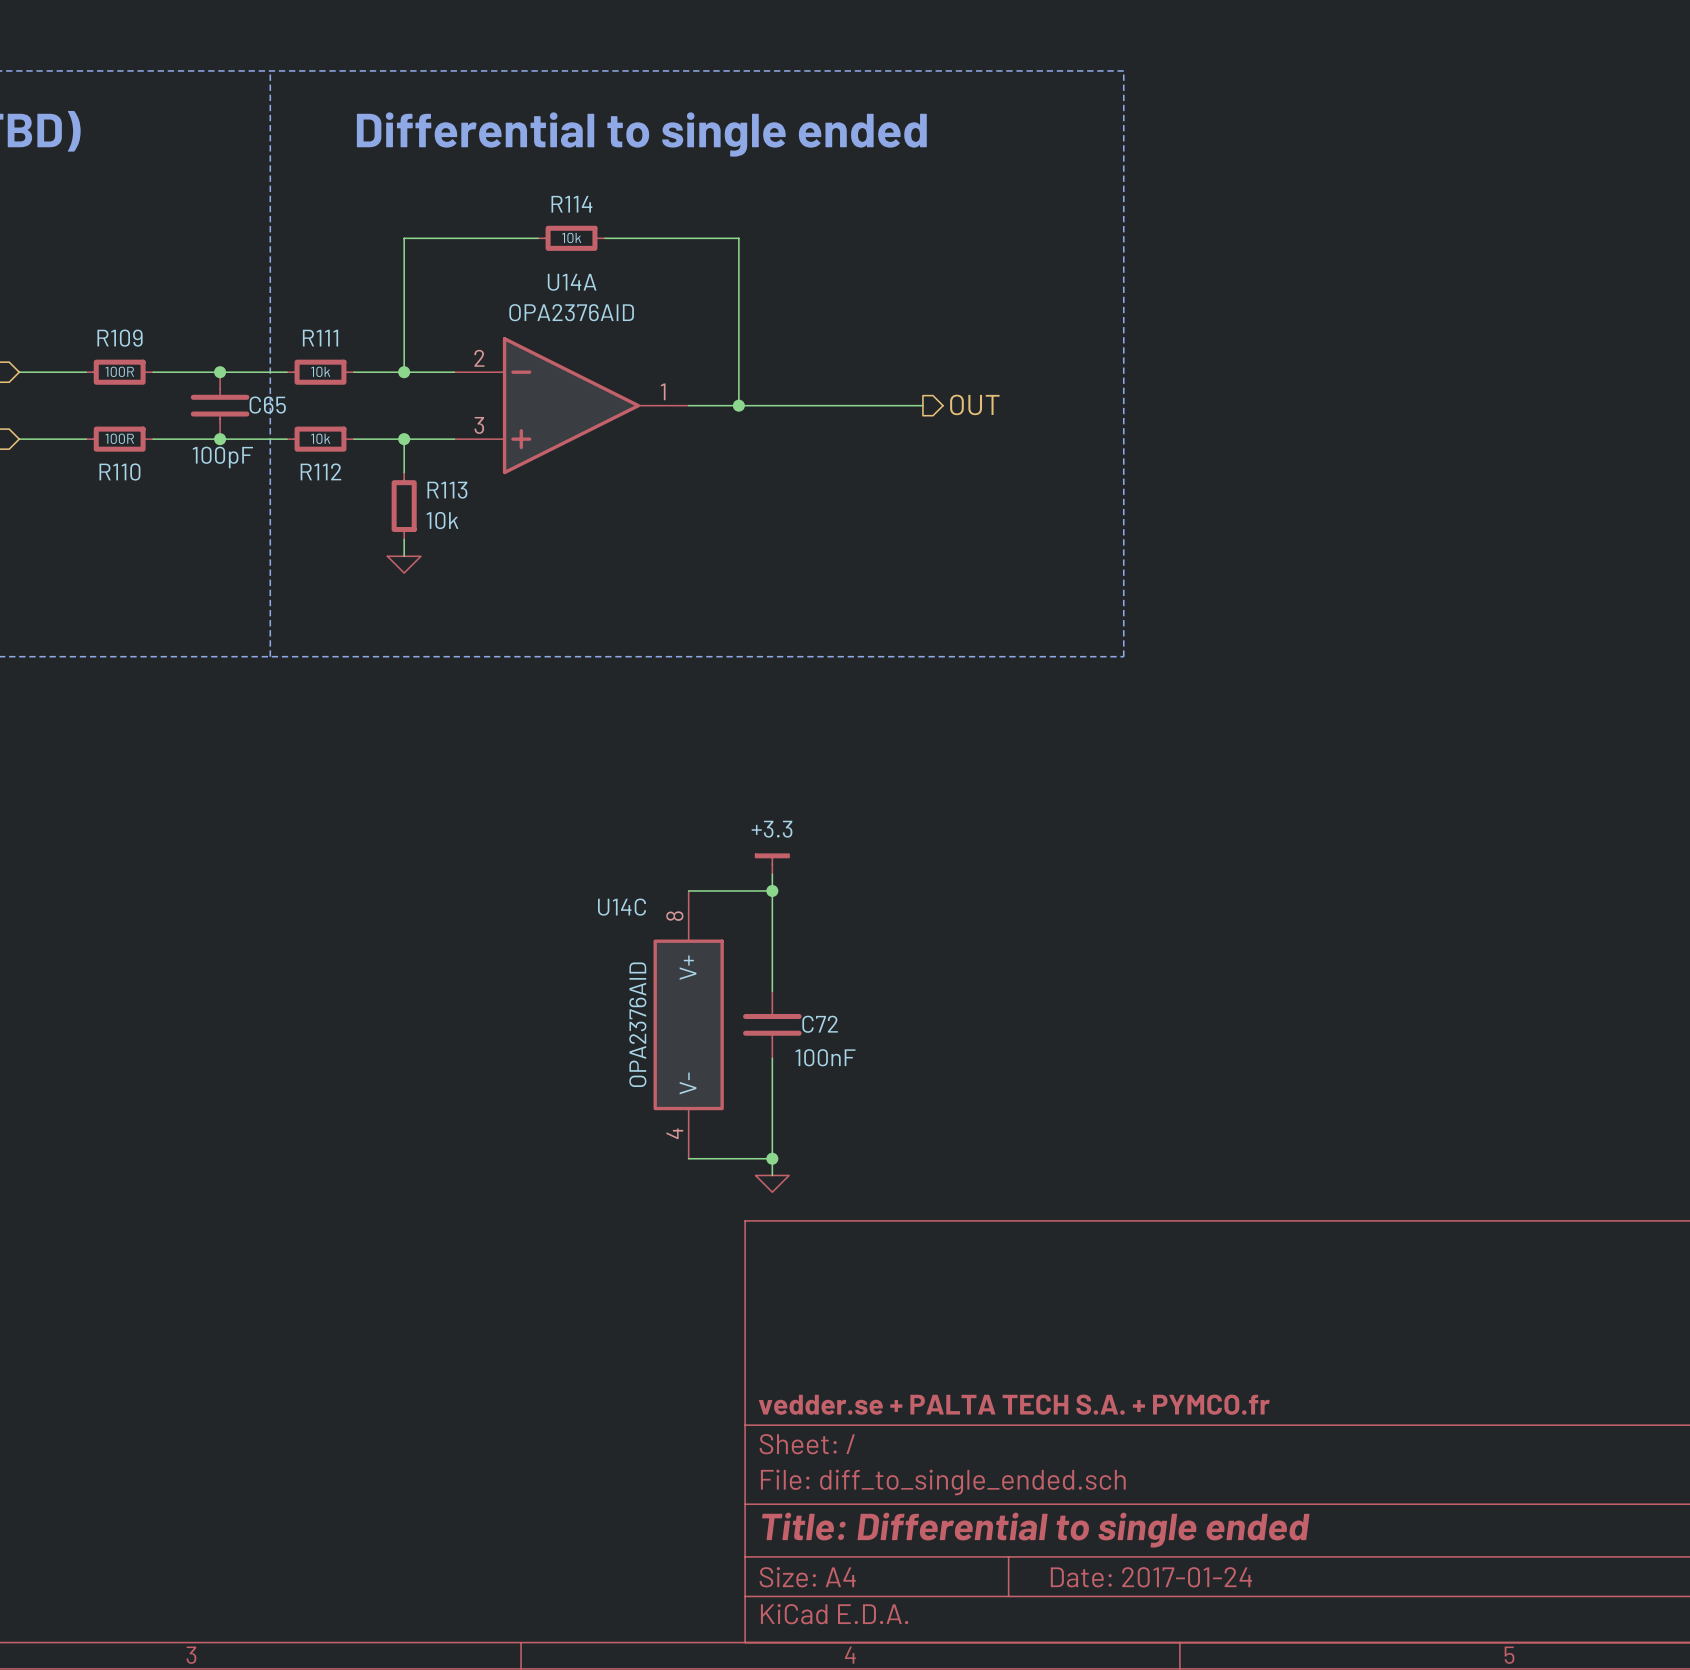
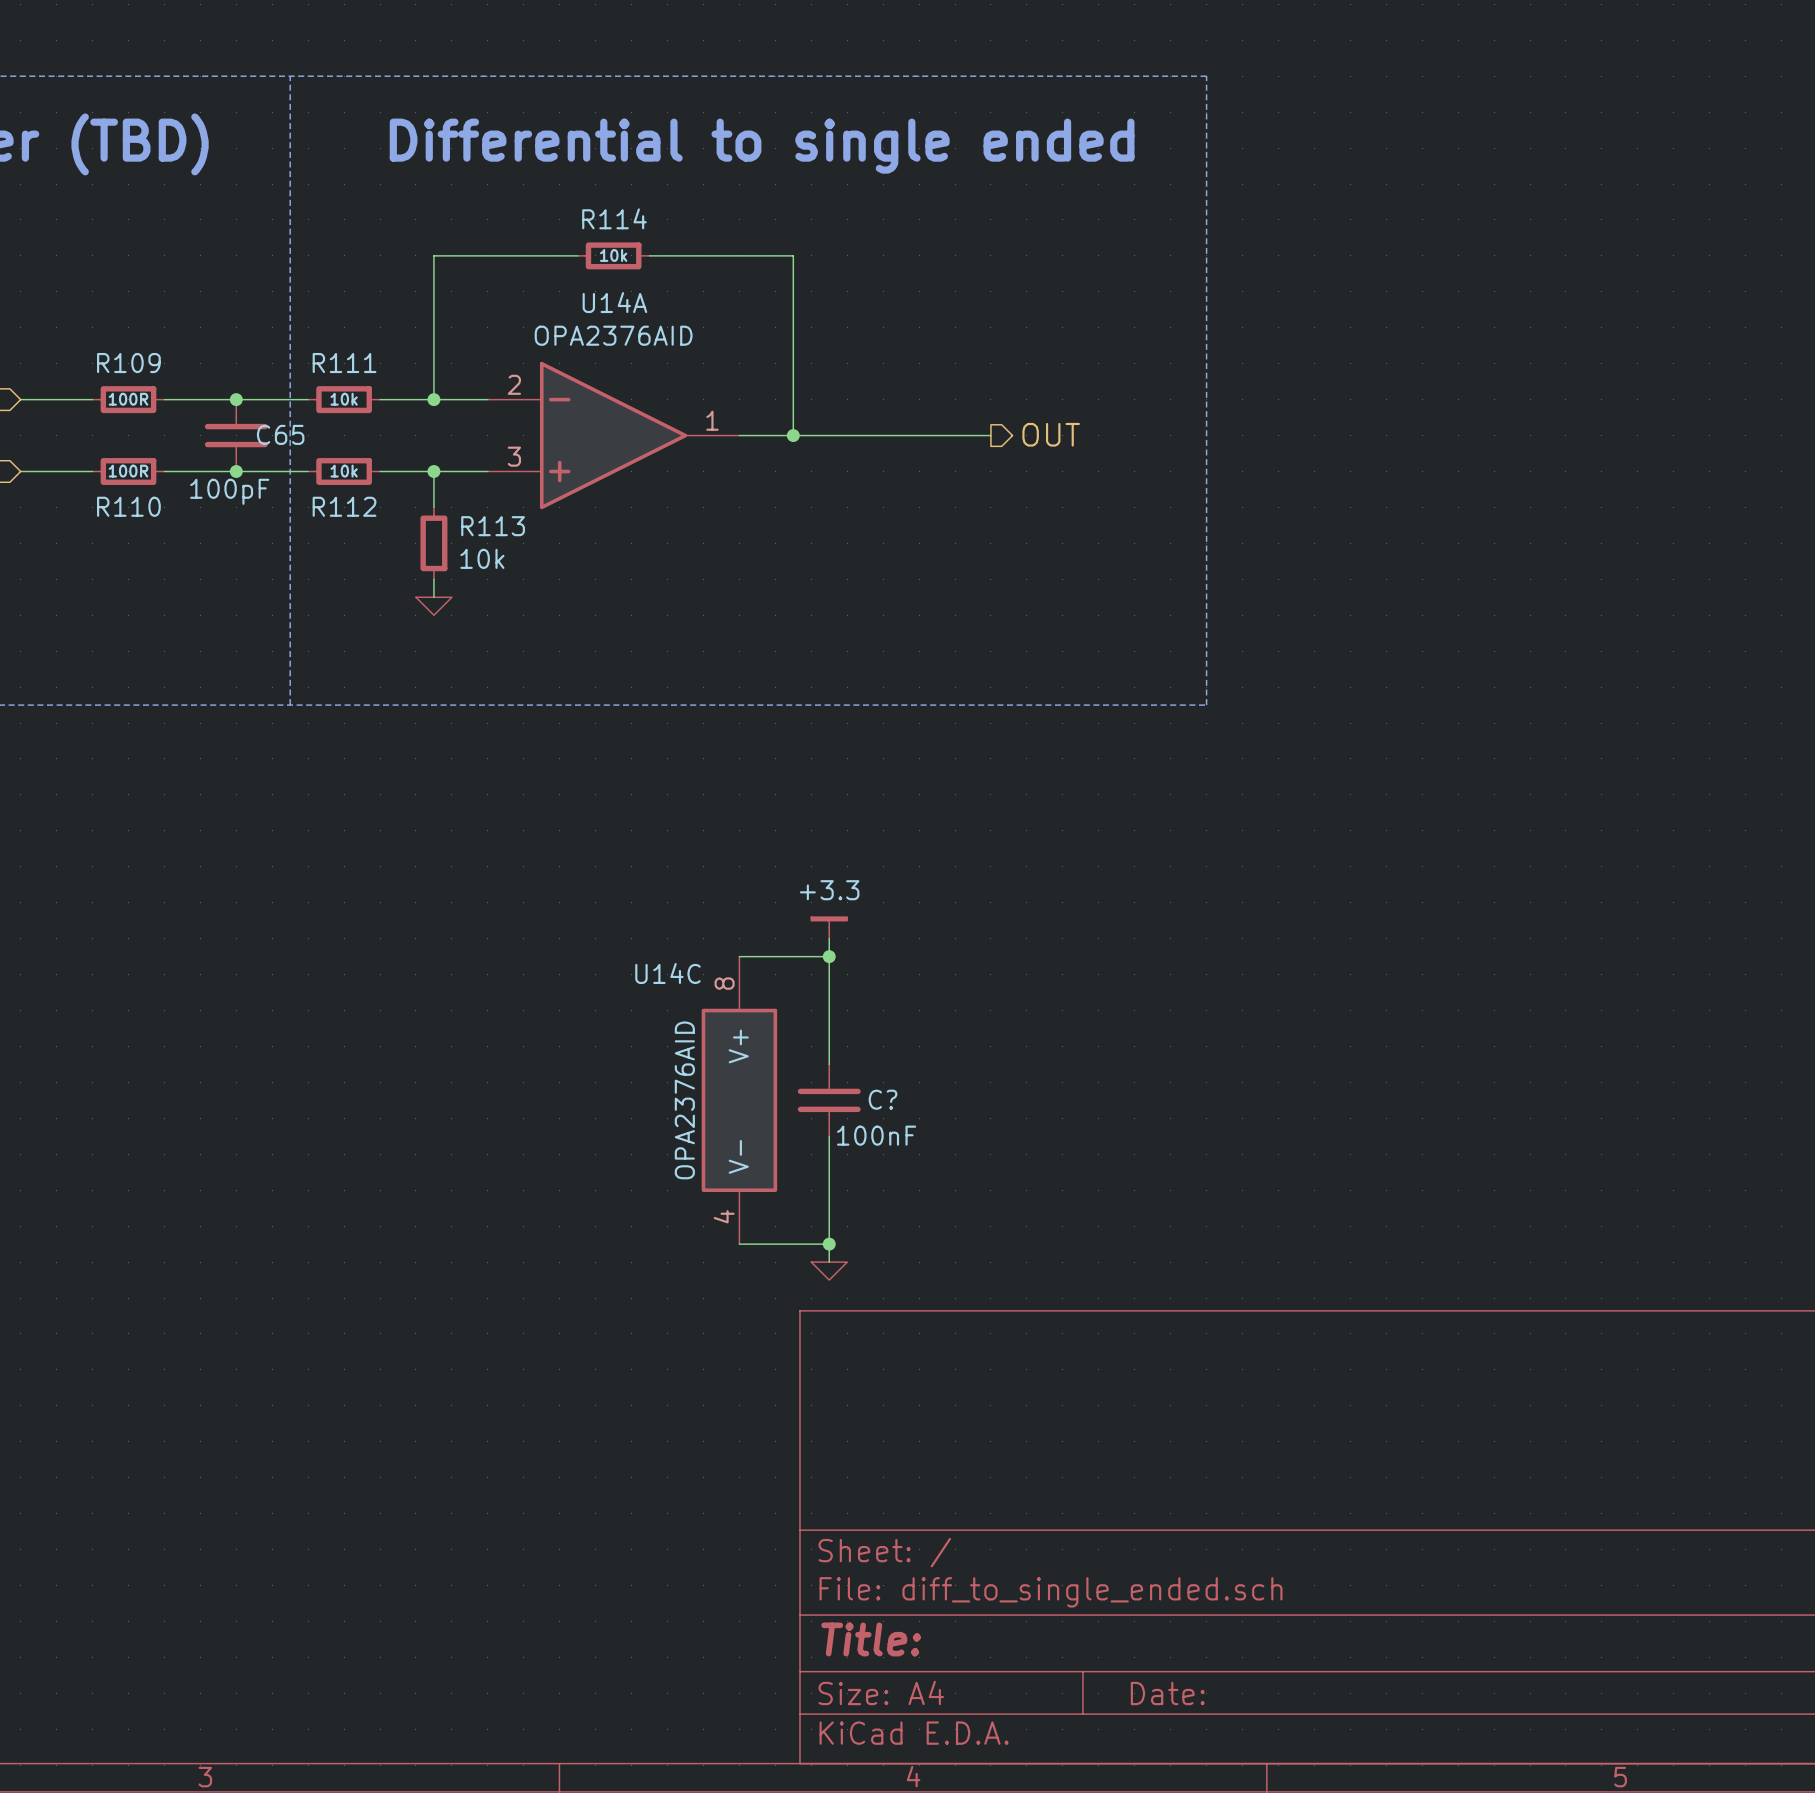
C72 name: C72 (820, 1024) -> C? (883, 1099)
title block: vedder.se + PALTA TECH S.A. + PYMCO.fr (1014, 1404) -> none
title block: Title: Differential to single ended (1035, 1530) -> Title: (871, 1639)
title block: Date: 2017-01-24 (1151, 1577) -> Date: (1167, 1693)

